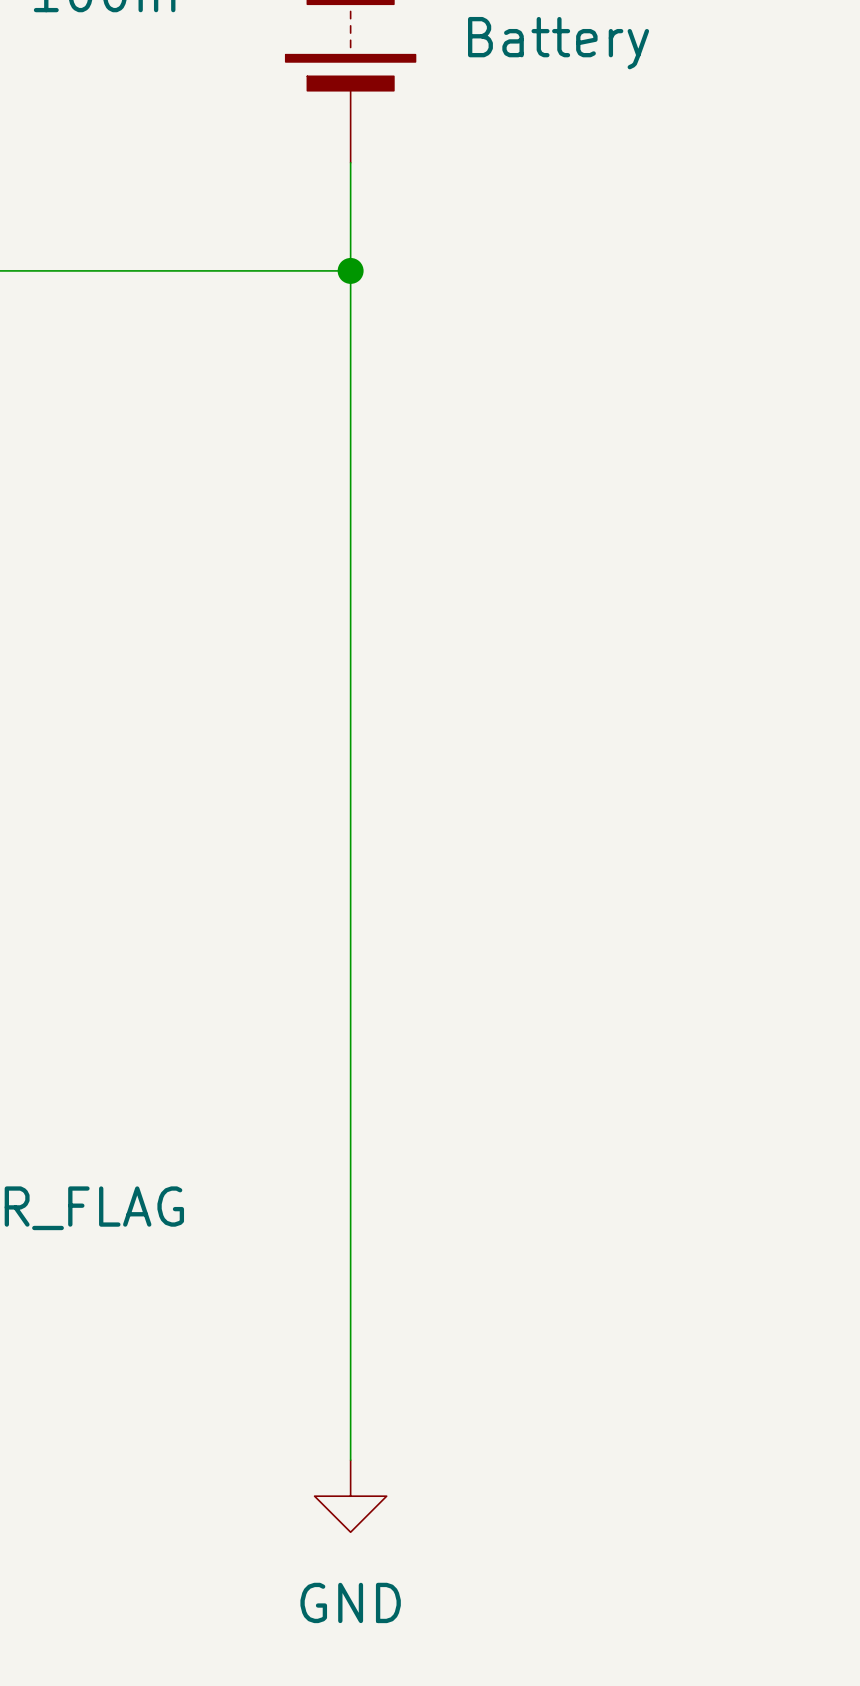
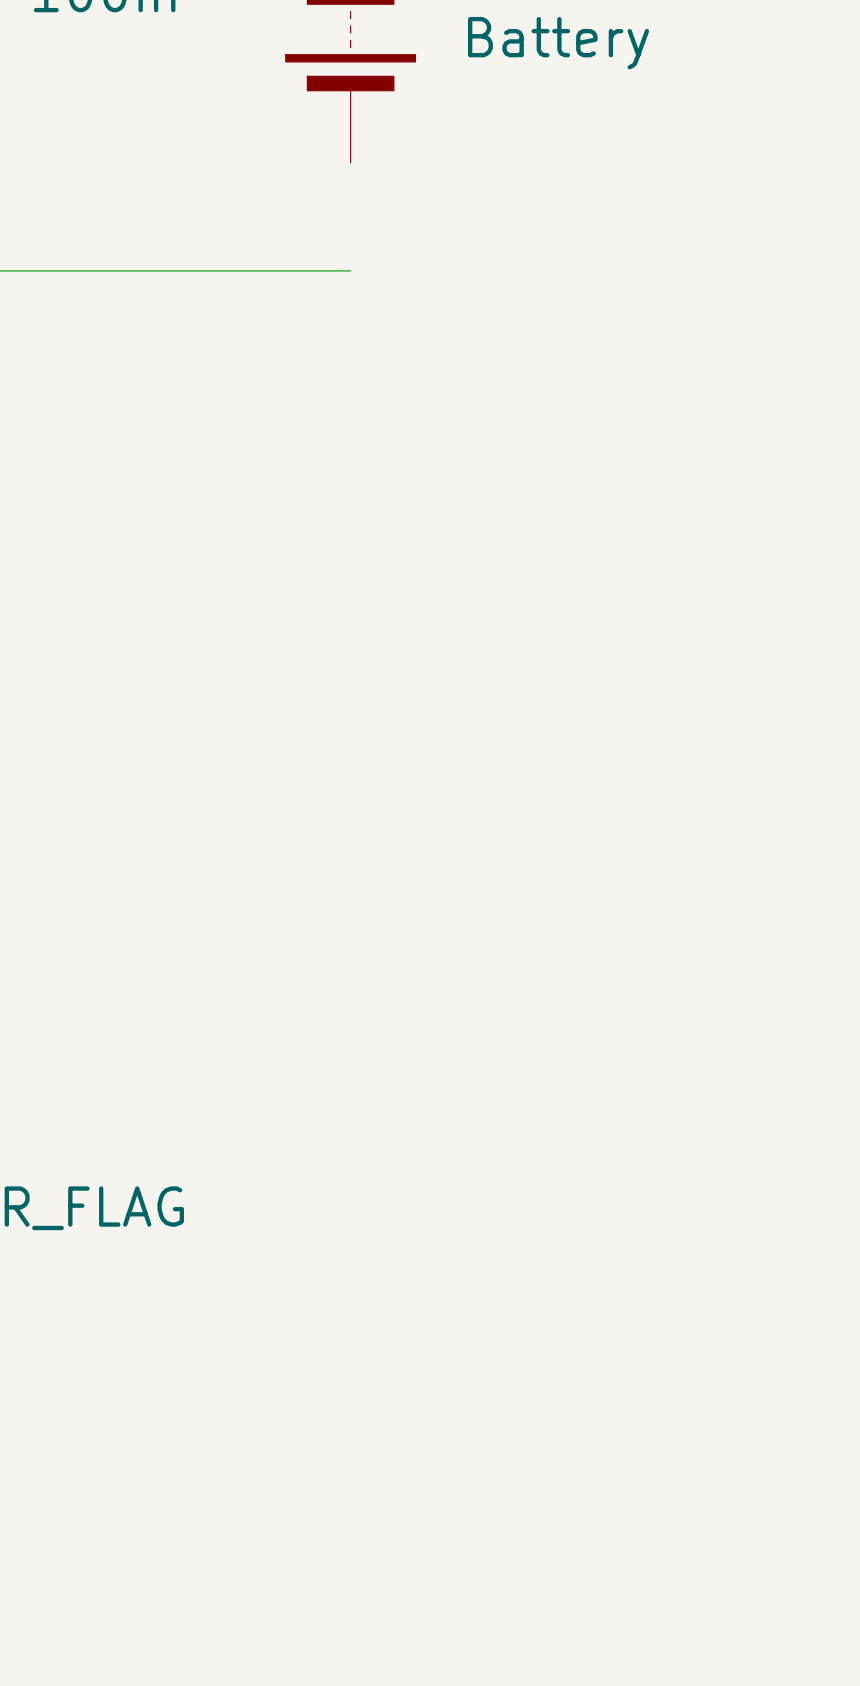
wire: (350, 162) (350, 1460) -> none
junction: (350, 270) -> none
power symbol: GND (350, 1496) -> none

